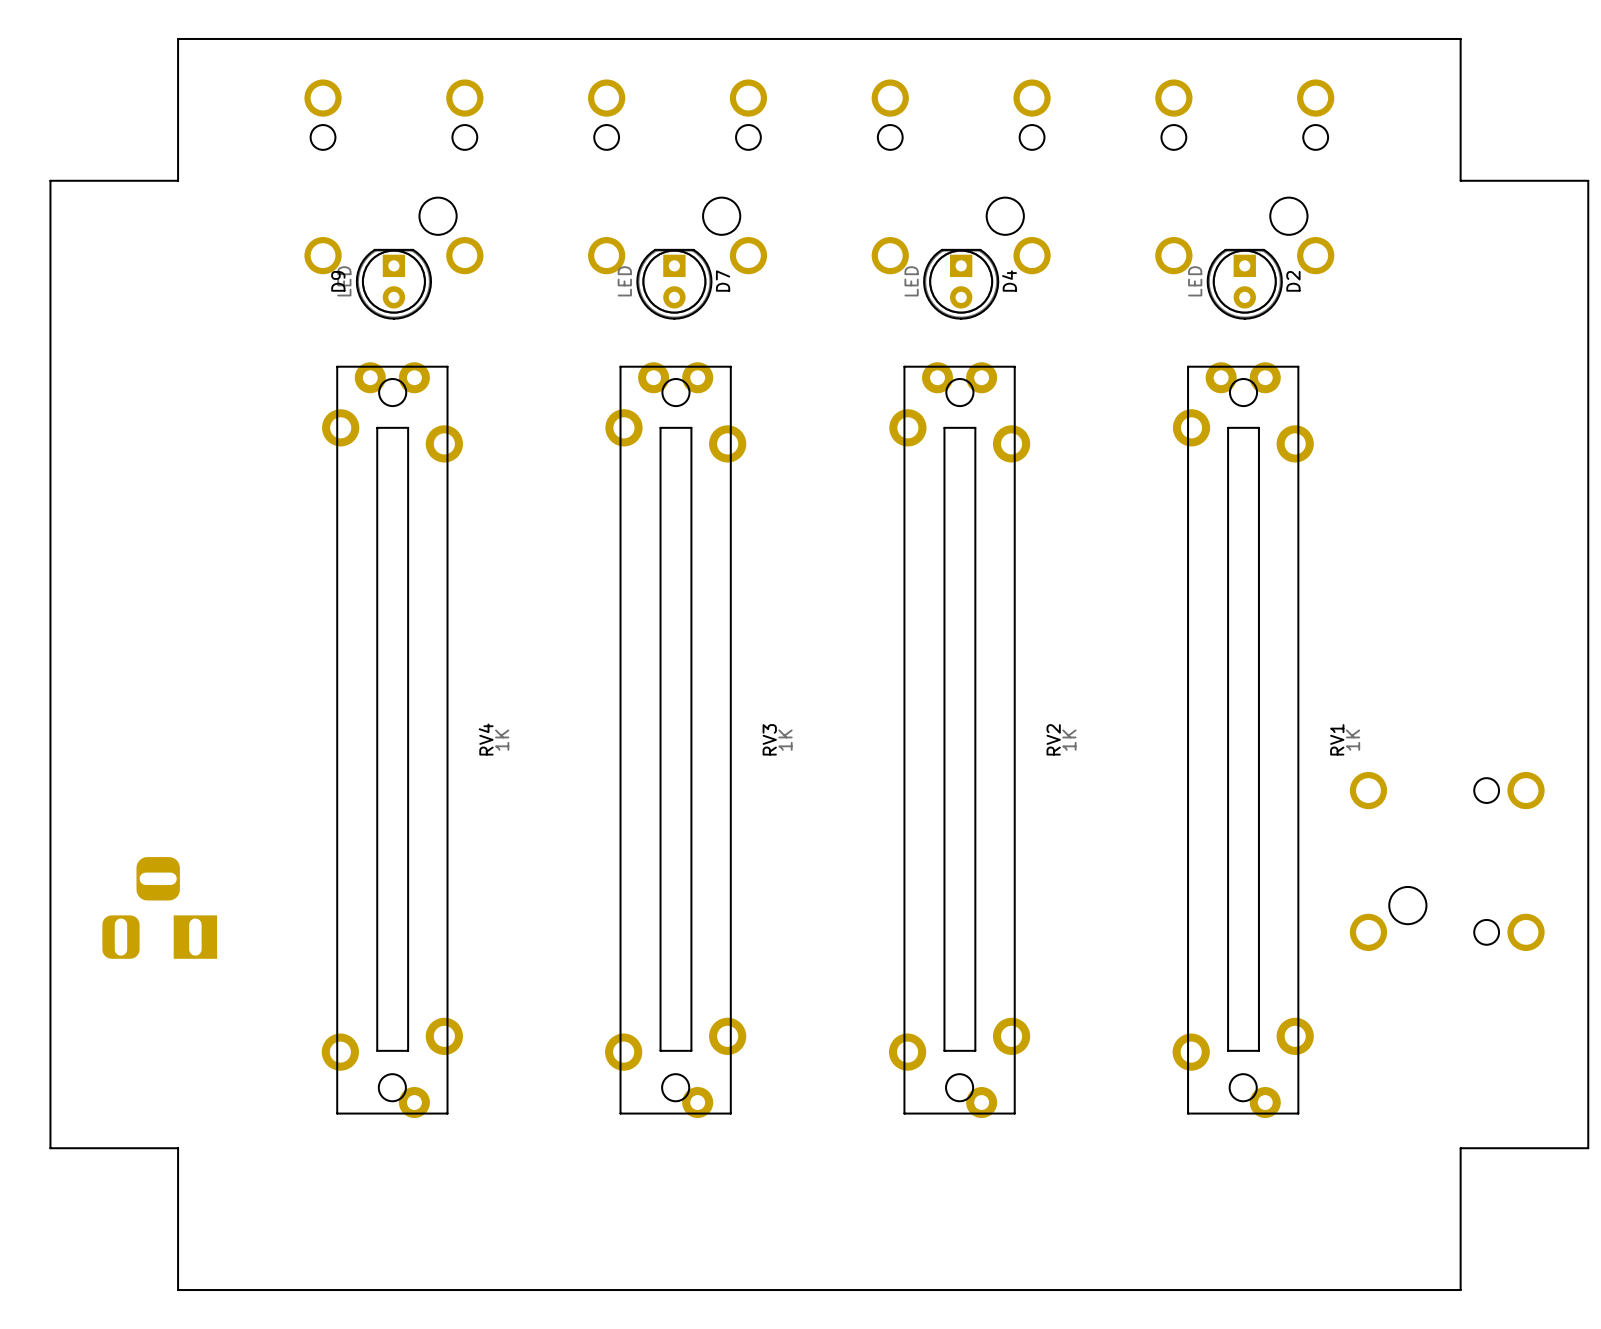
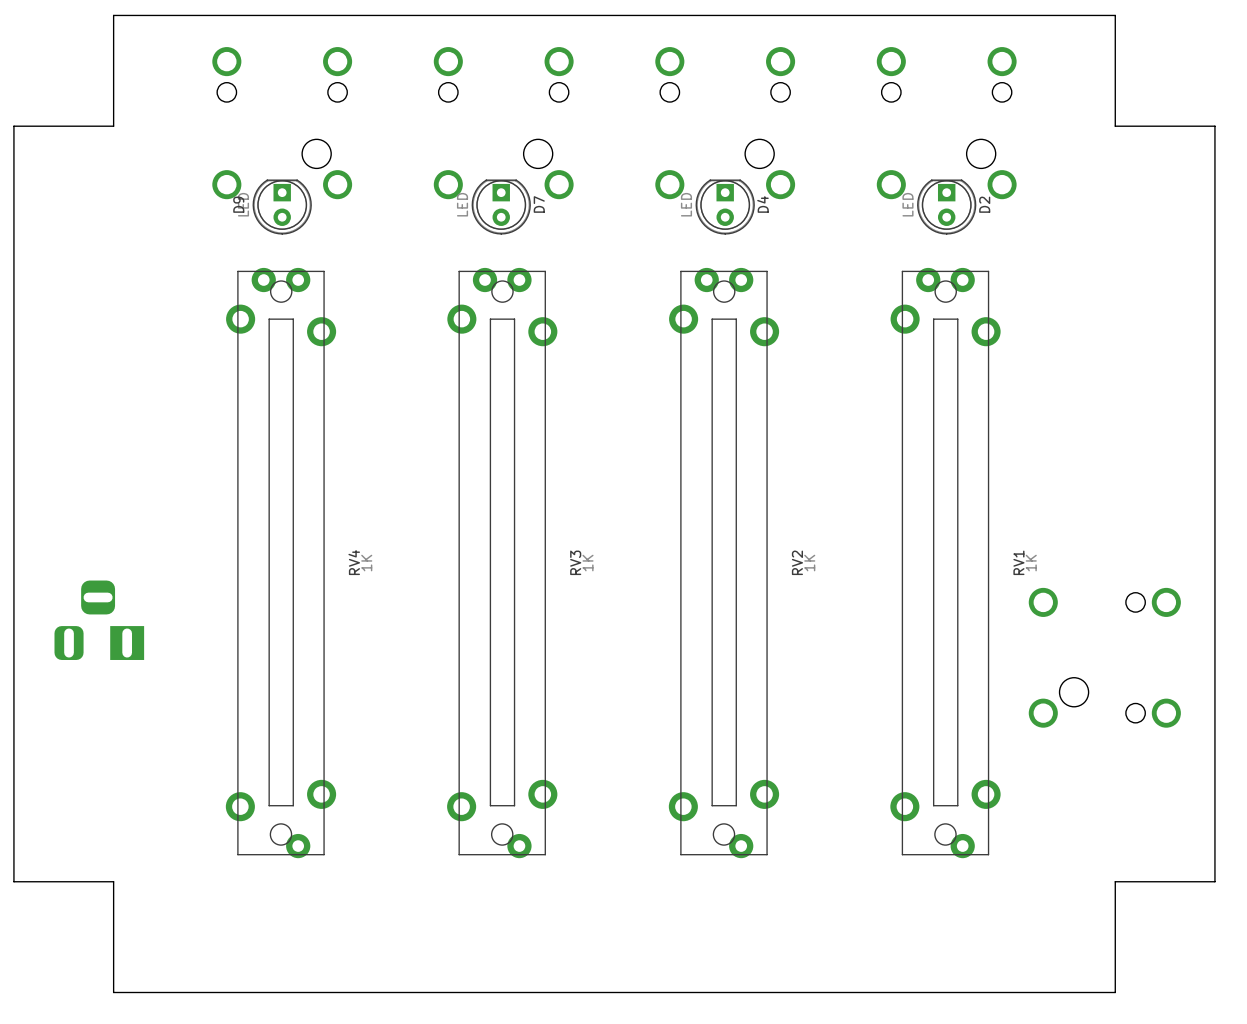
part position: (159, 907) -> (99, 620)

